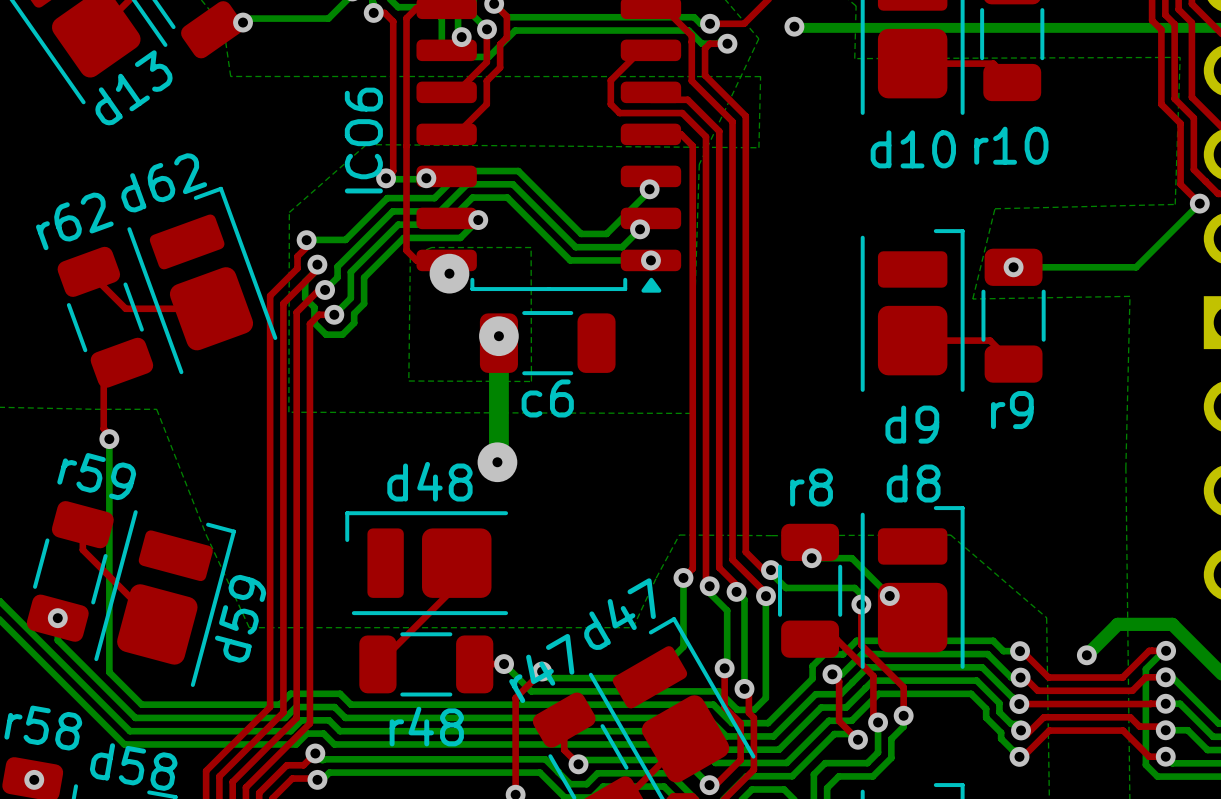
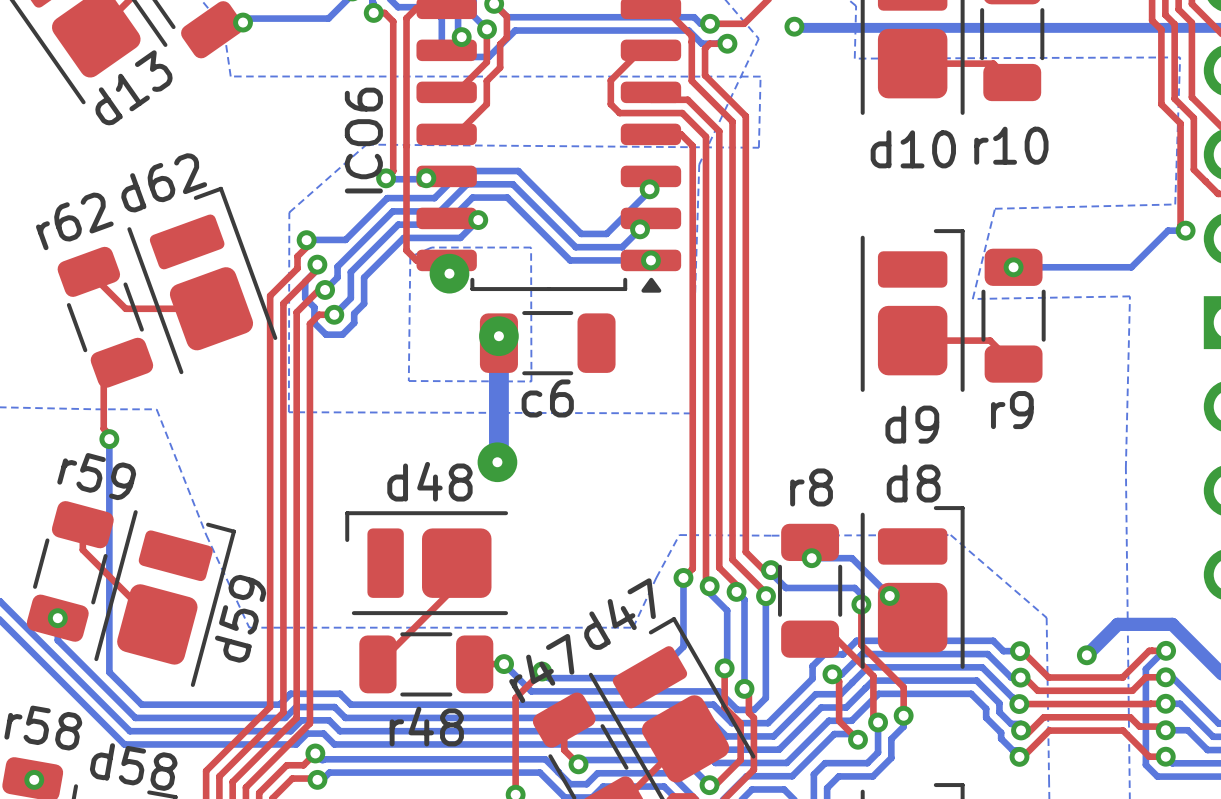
top track: (1180, 184) (1199, 203) -> (1180, 184) (1180, 225) (1185, 230)
bottom track: (1199, 203) (1136, 267) (1131, 267) -> (1185, 230) (1168, 230) (1131, 267)
via position: (1199, 203) -> (1185, 230)

